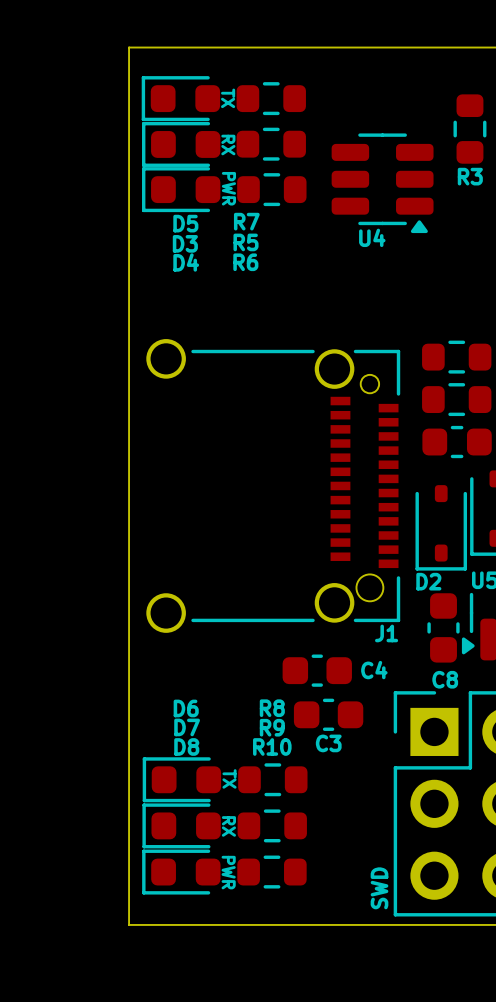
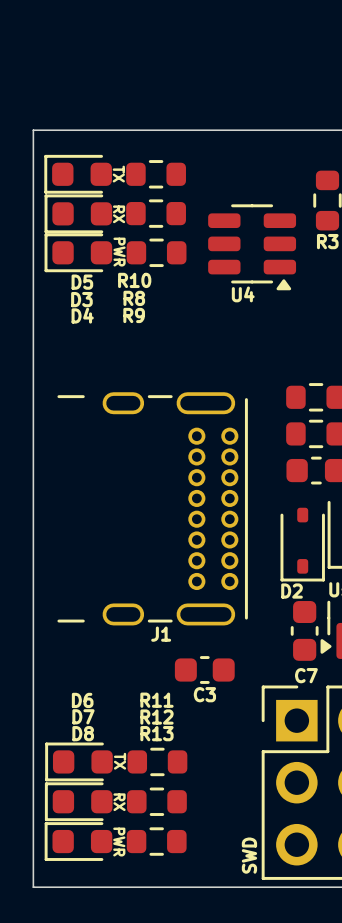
R7 name: R7 (246, 221) -> R10 (134, 280)
R5 name: R5 (246, 242) -> R8 (134, 298)
R6 name: R6 (245, 262) -> R9 (134, 315)
J1 footprint: [146, 339, 401, 633] -> [57, 392, 248, 626]
J1 name position: J1 (386, 633) -> J1 (161, 634)
C4: (317, 670) -> none
C8 name: C8 (445, 679) -> C7 (306, 675)
R8 name: R8 (272, 708) -> R11 (156, 700)
C3 position: (328, 714) -> (204, 670)
R9 name: R9 (272, 727) -> R12 (156, 717)
R10 name: R10 (272, 746) -> R13 (156, 733)

